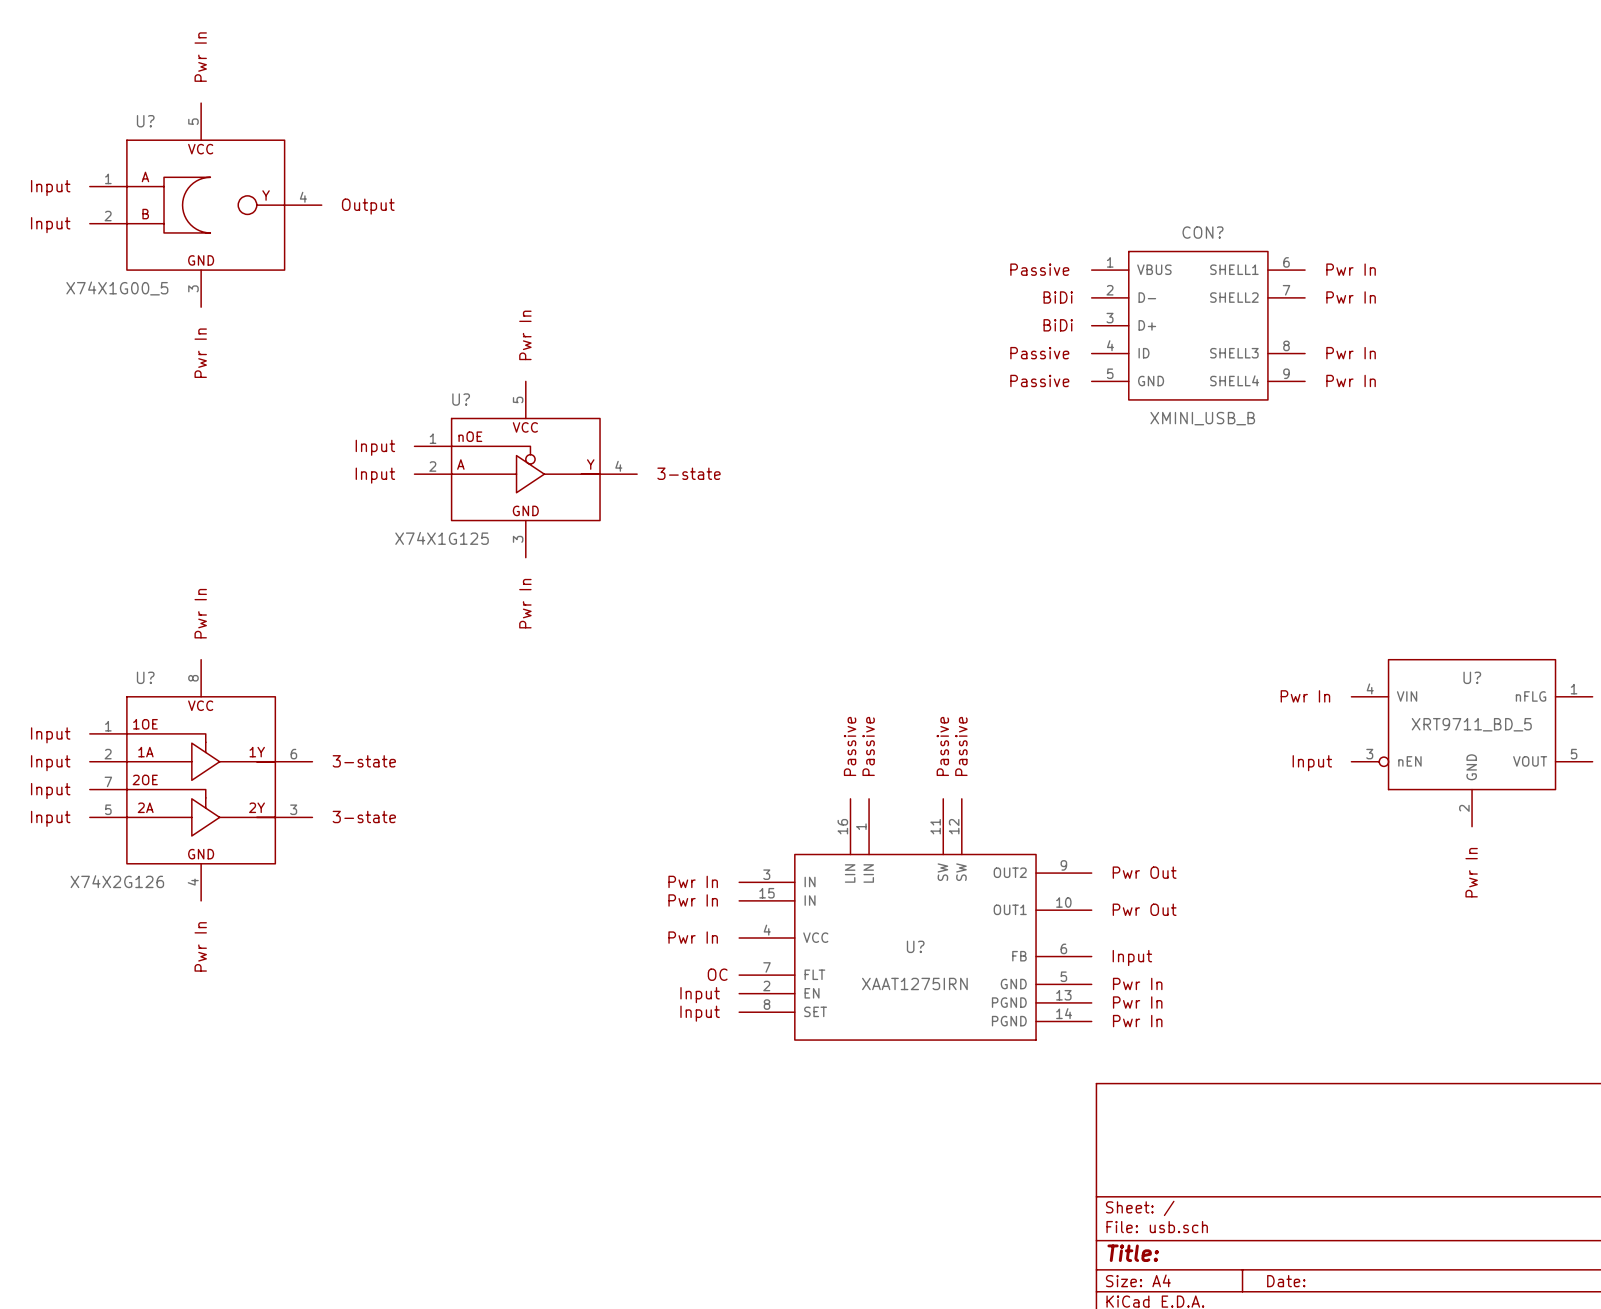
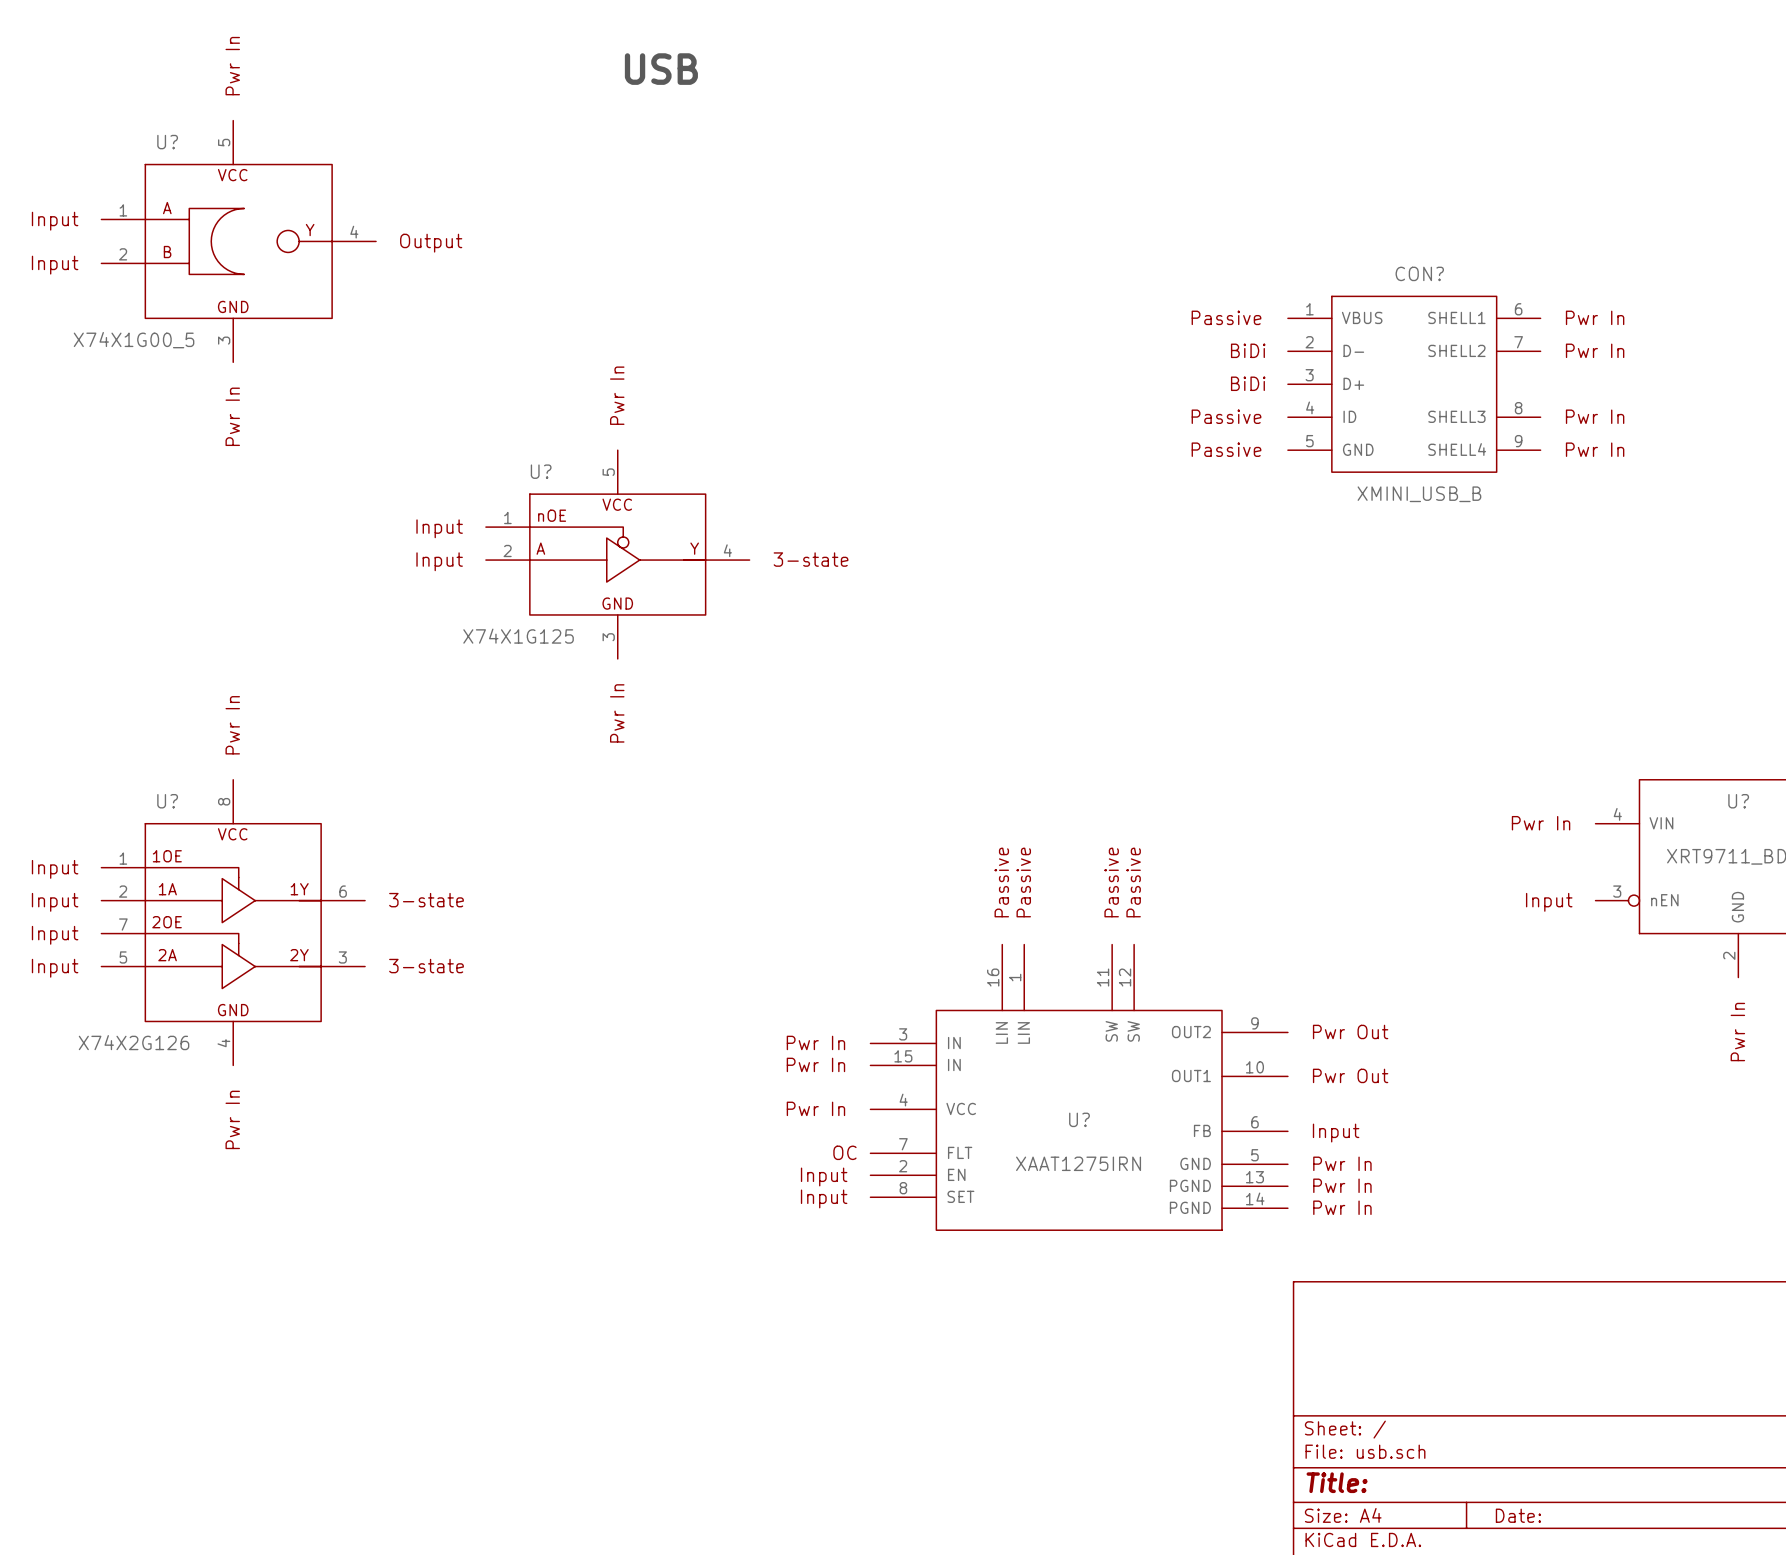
text: none -> USB (661, 69)

